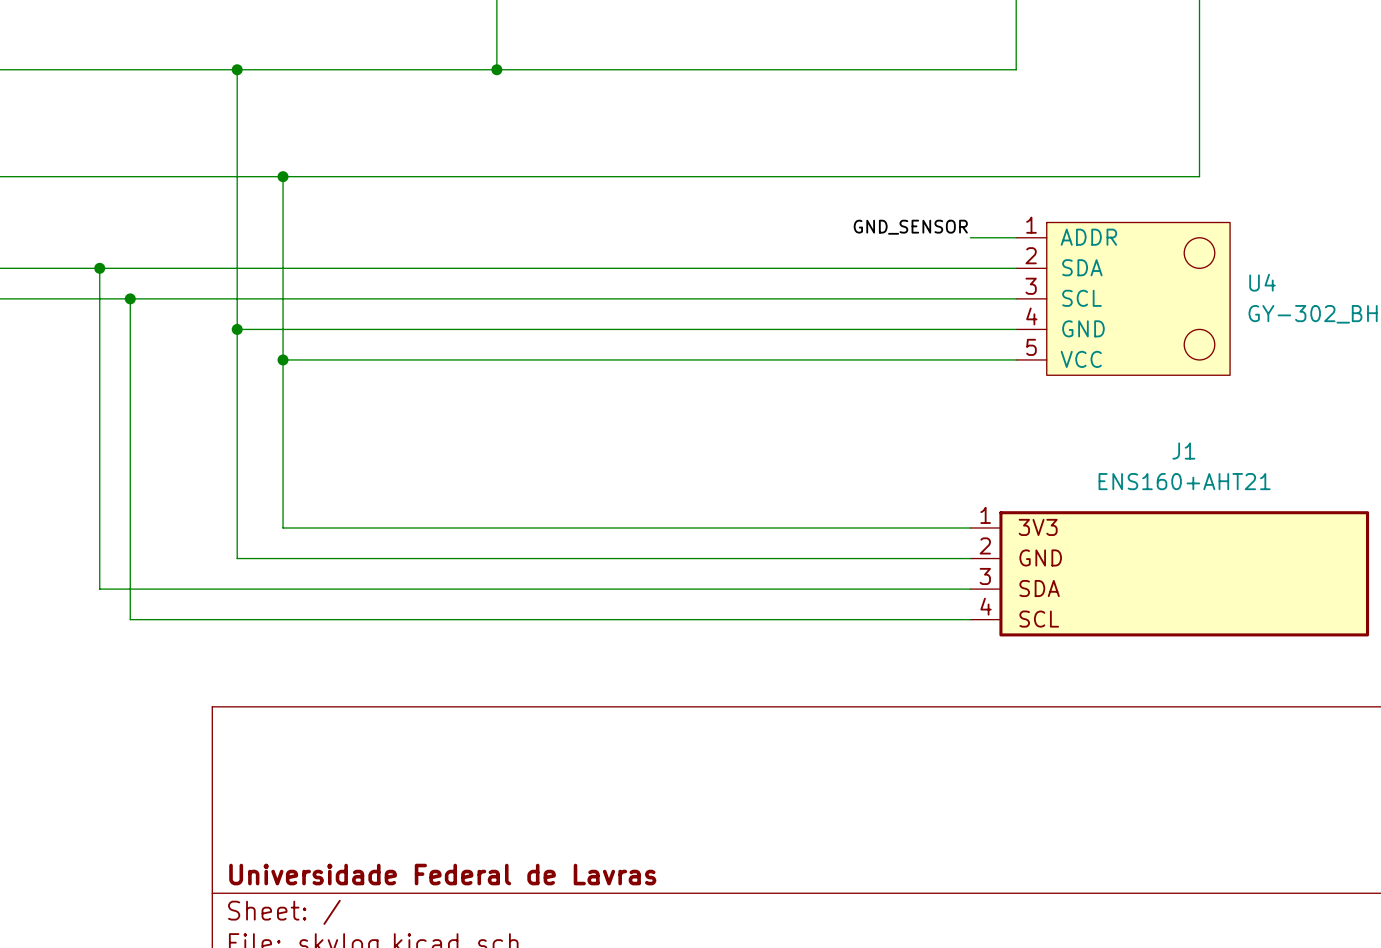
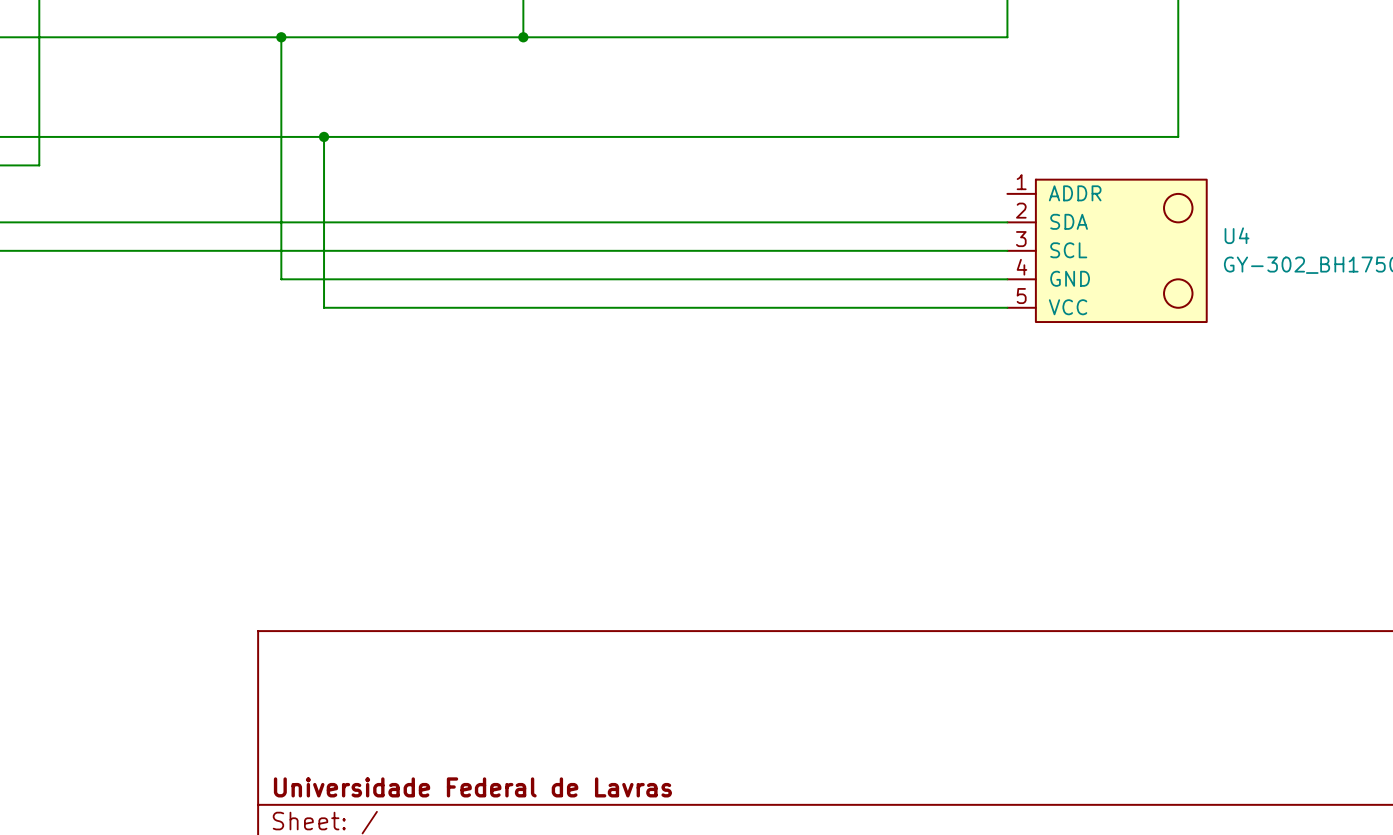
label: GND_SENSOR (910, 227) -> none
wire: (970, 237) (1016, 237) -> none
wire: (99, 268) (99, 589) (970, 589) -> none
junction: (99, 268) -> none
wire: (130, 298) (130, 619) (970, 619) -> none
junction: (130, 298) -> none
wire: (237, 329) (237, 558) (970, 558) -> none
junction: (237, 329) -> none
wire: (283, 359) (283, 527) (970, 527) -> none
junction: (283, 359) -> none
J1: ENS160+AHT21 (1169, 573) -> none

